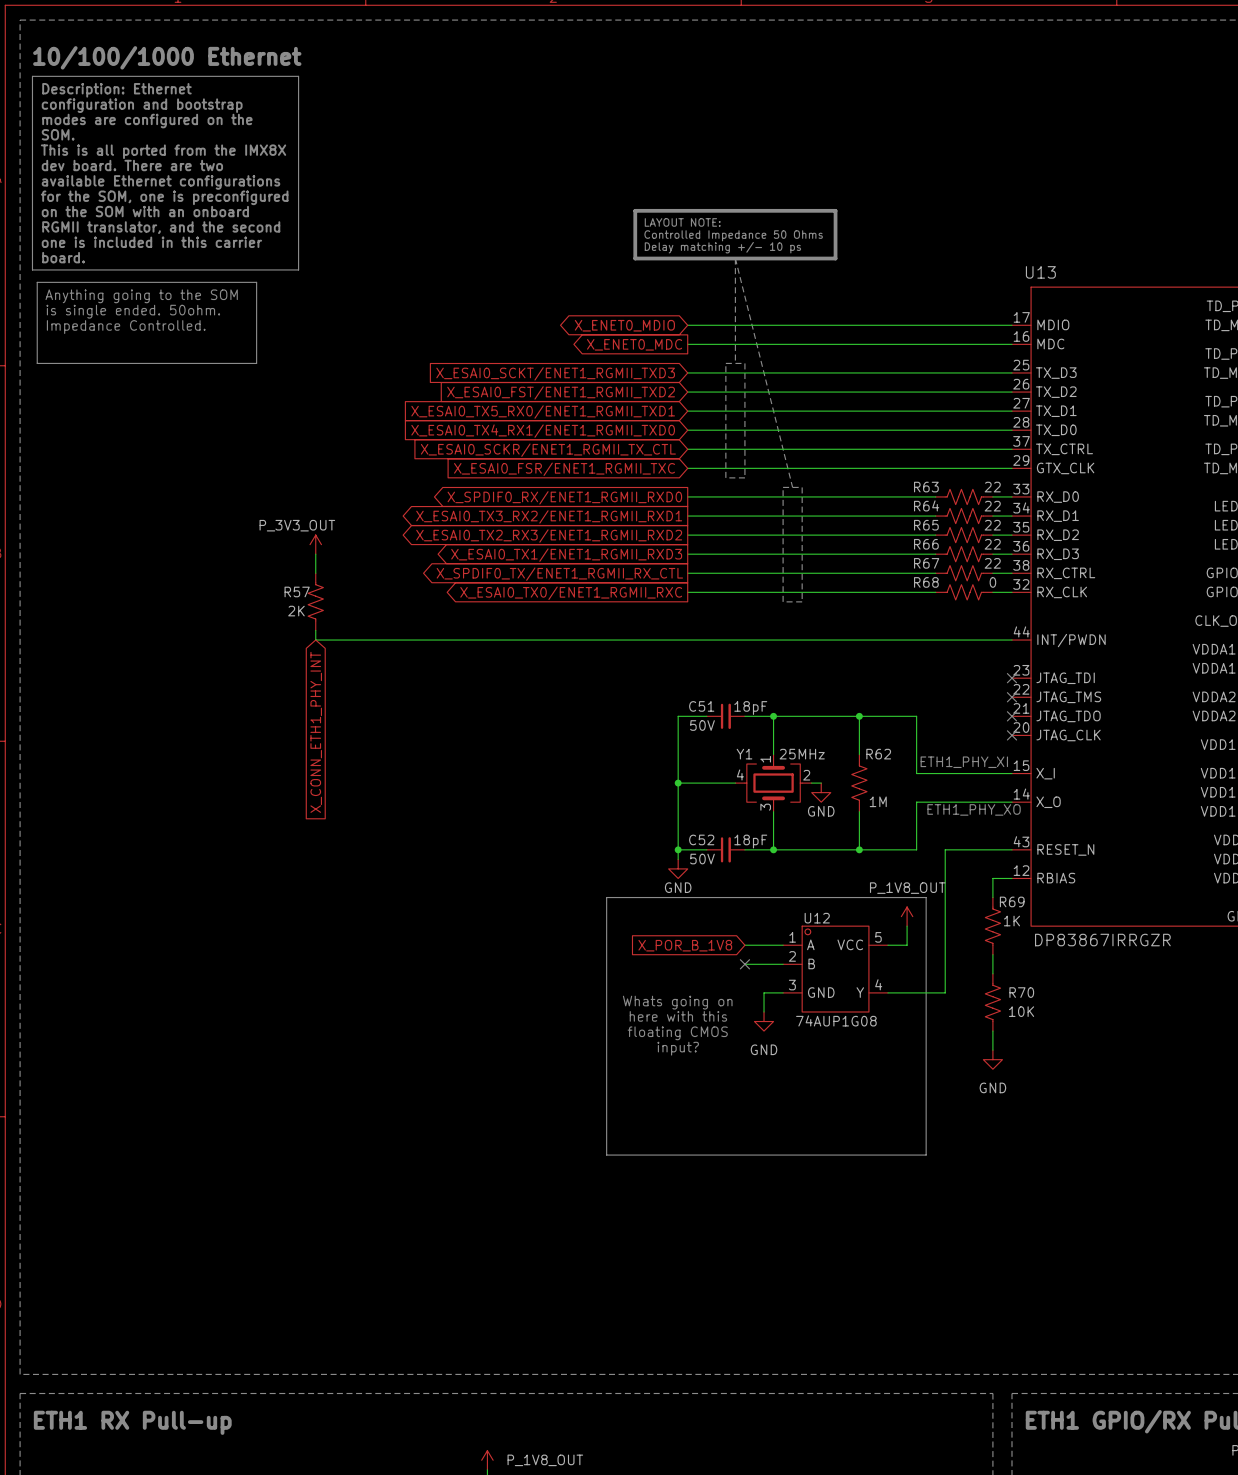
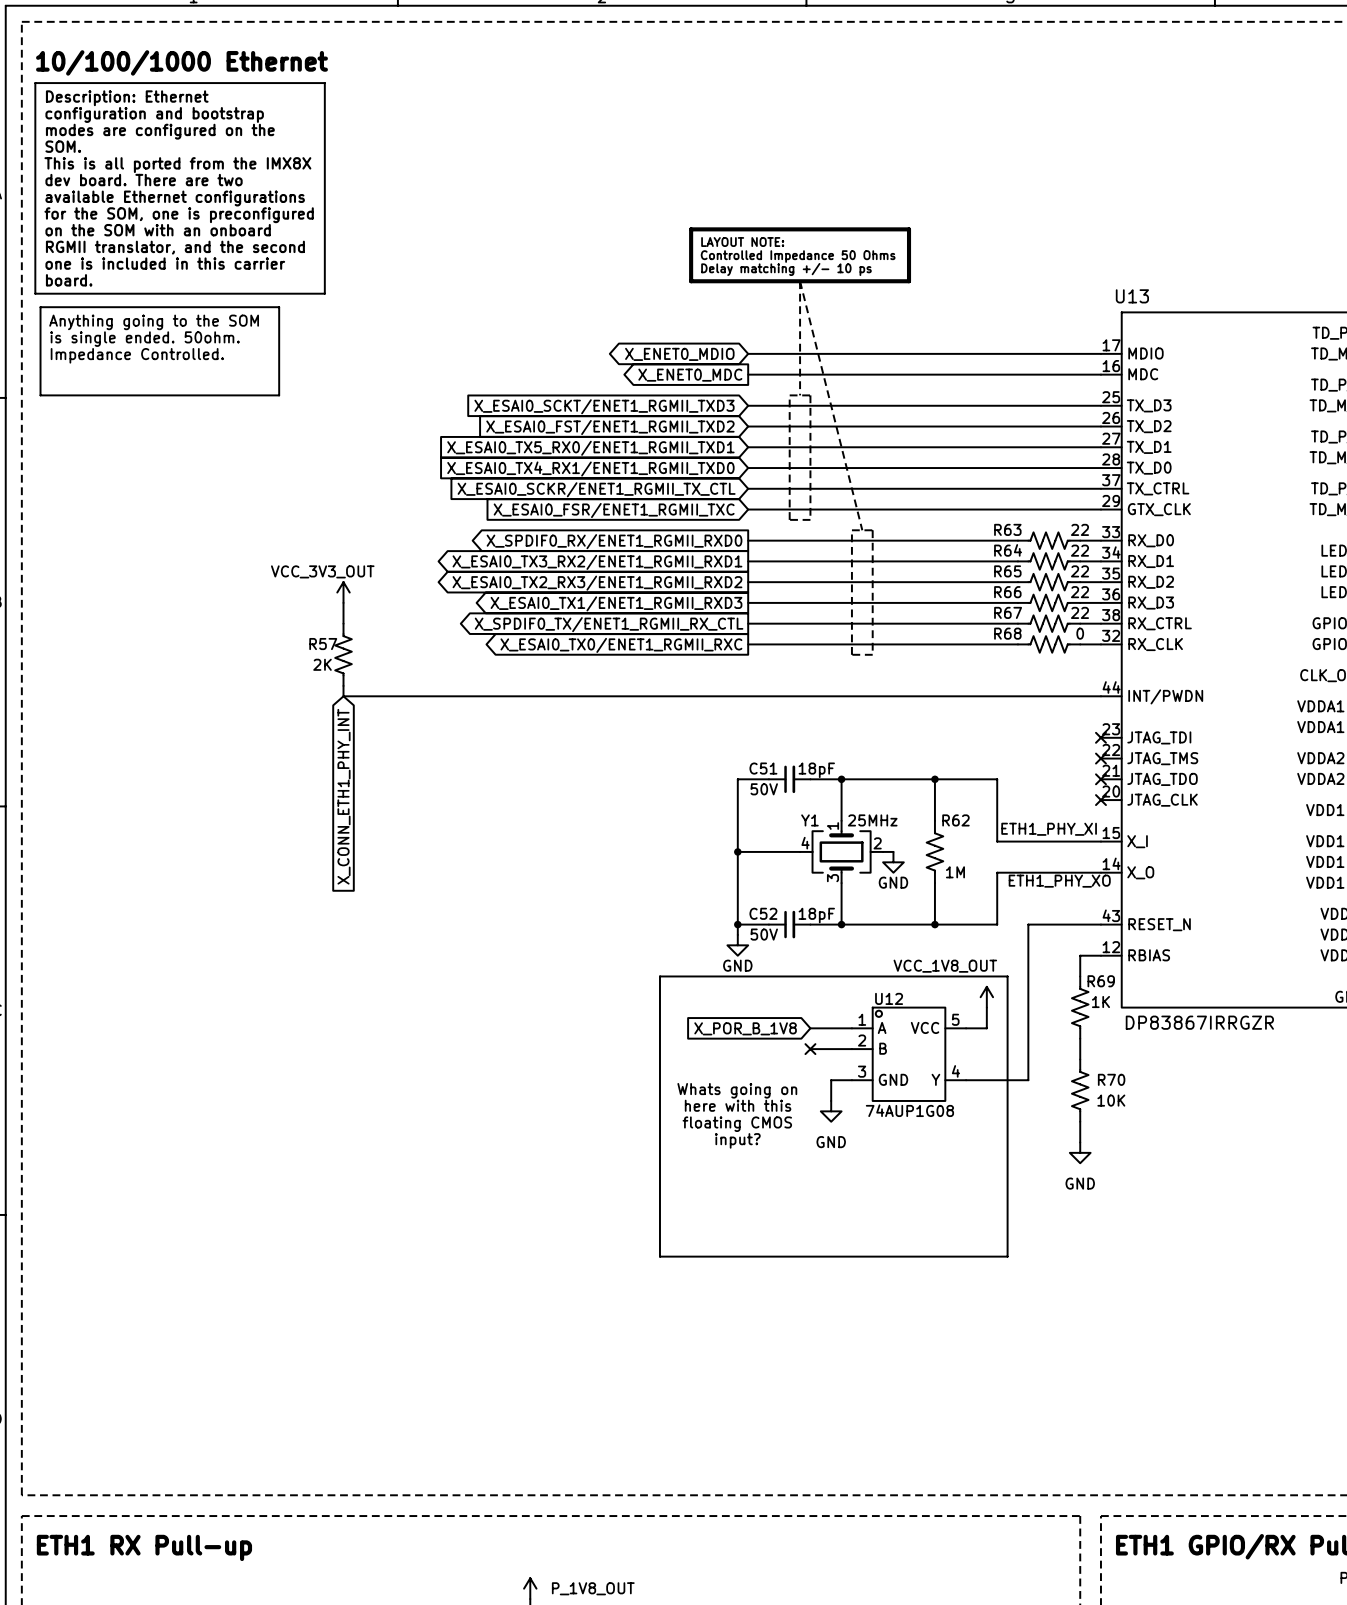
power symbol: P_3V3_OUT (315, 544) -> VCC_3V3_OUT (343, 592)
power symbol: P_1V8_OUT (907, 916) -> VCC_1V8_OUT (986, 997)

